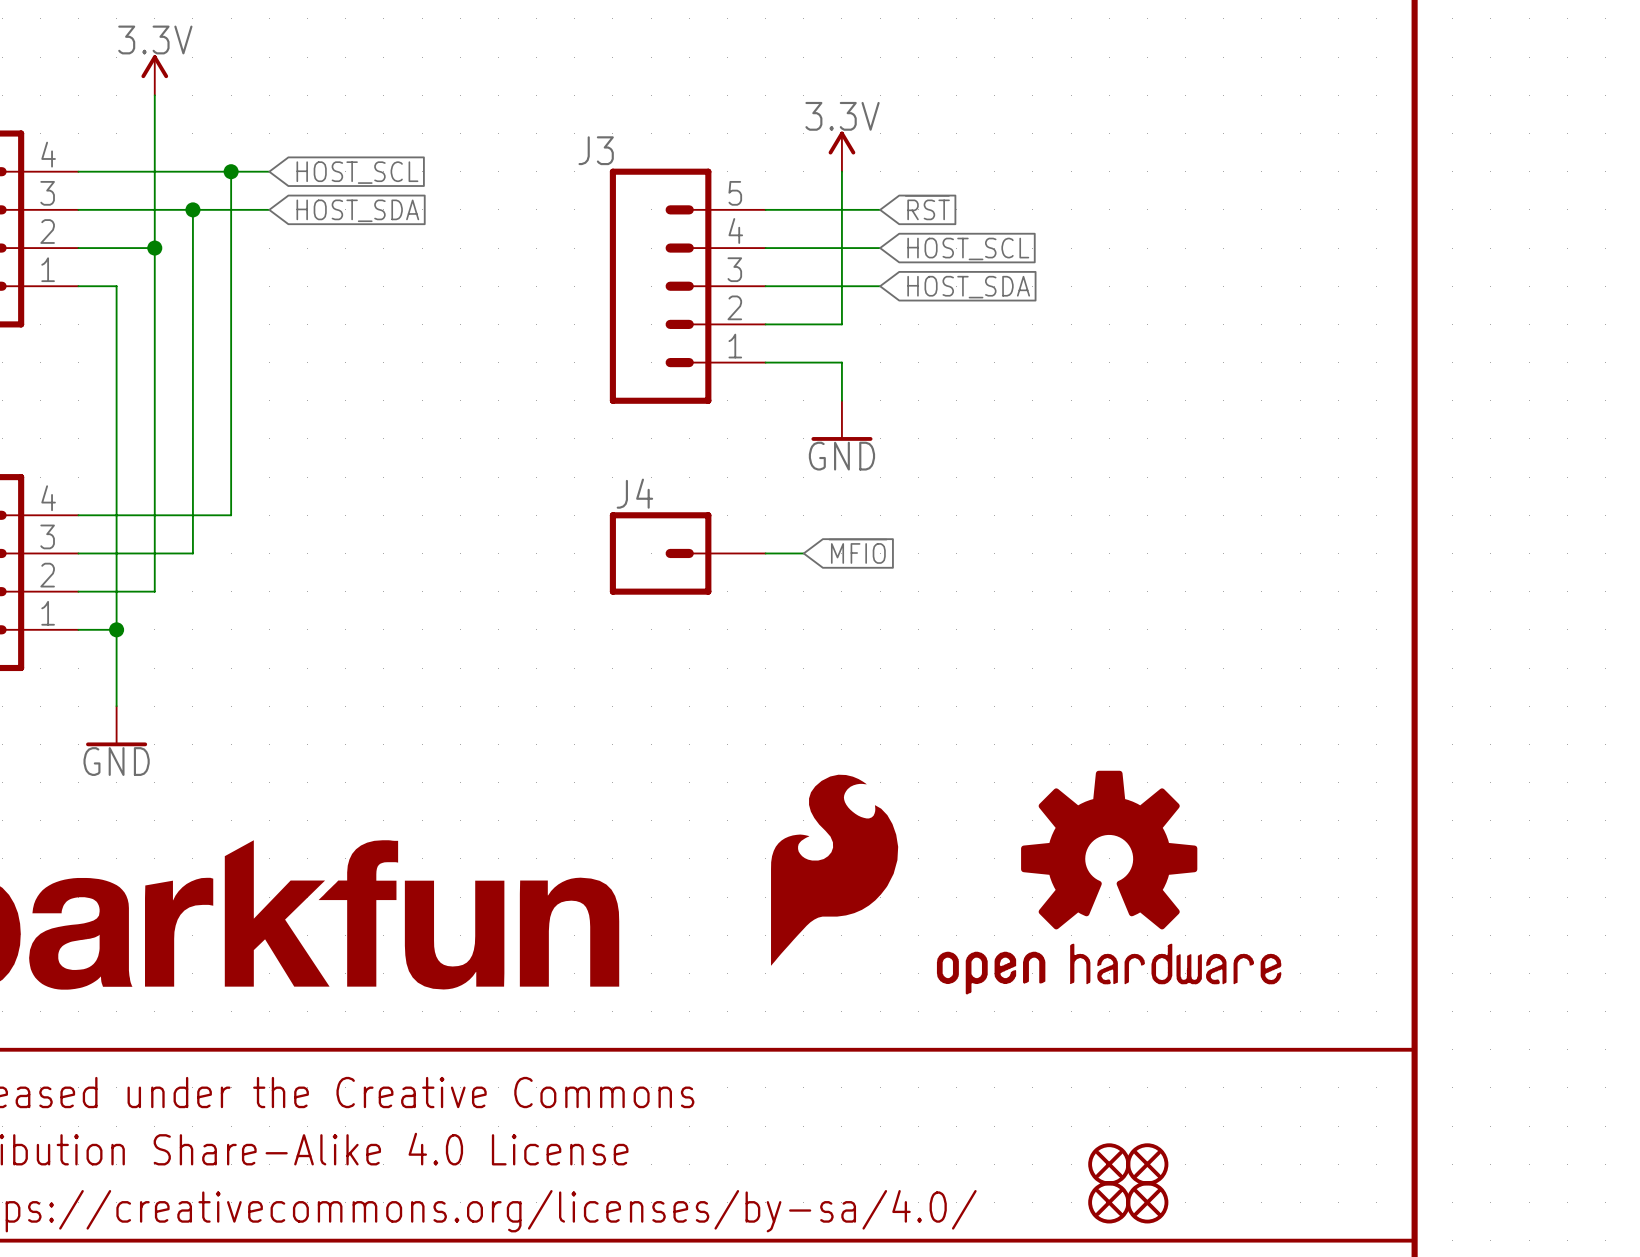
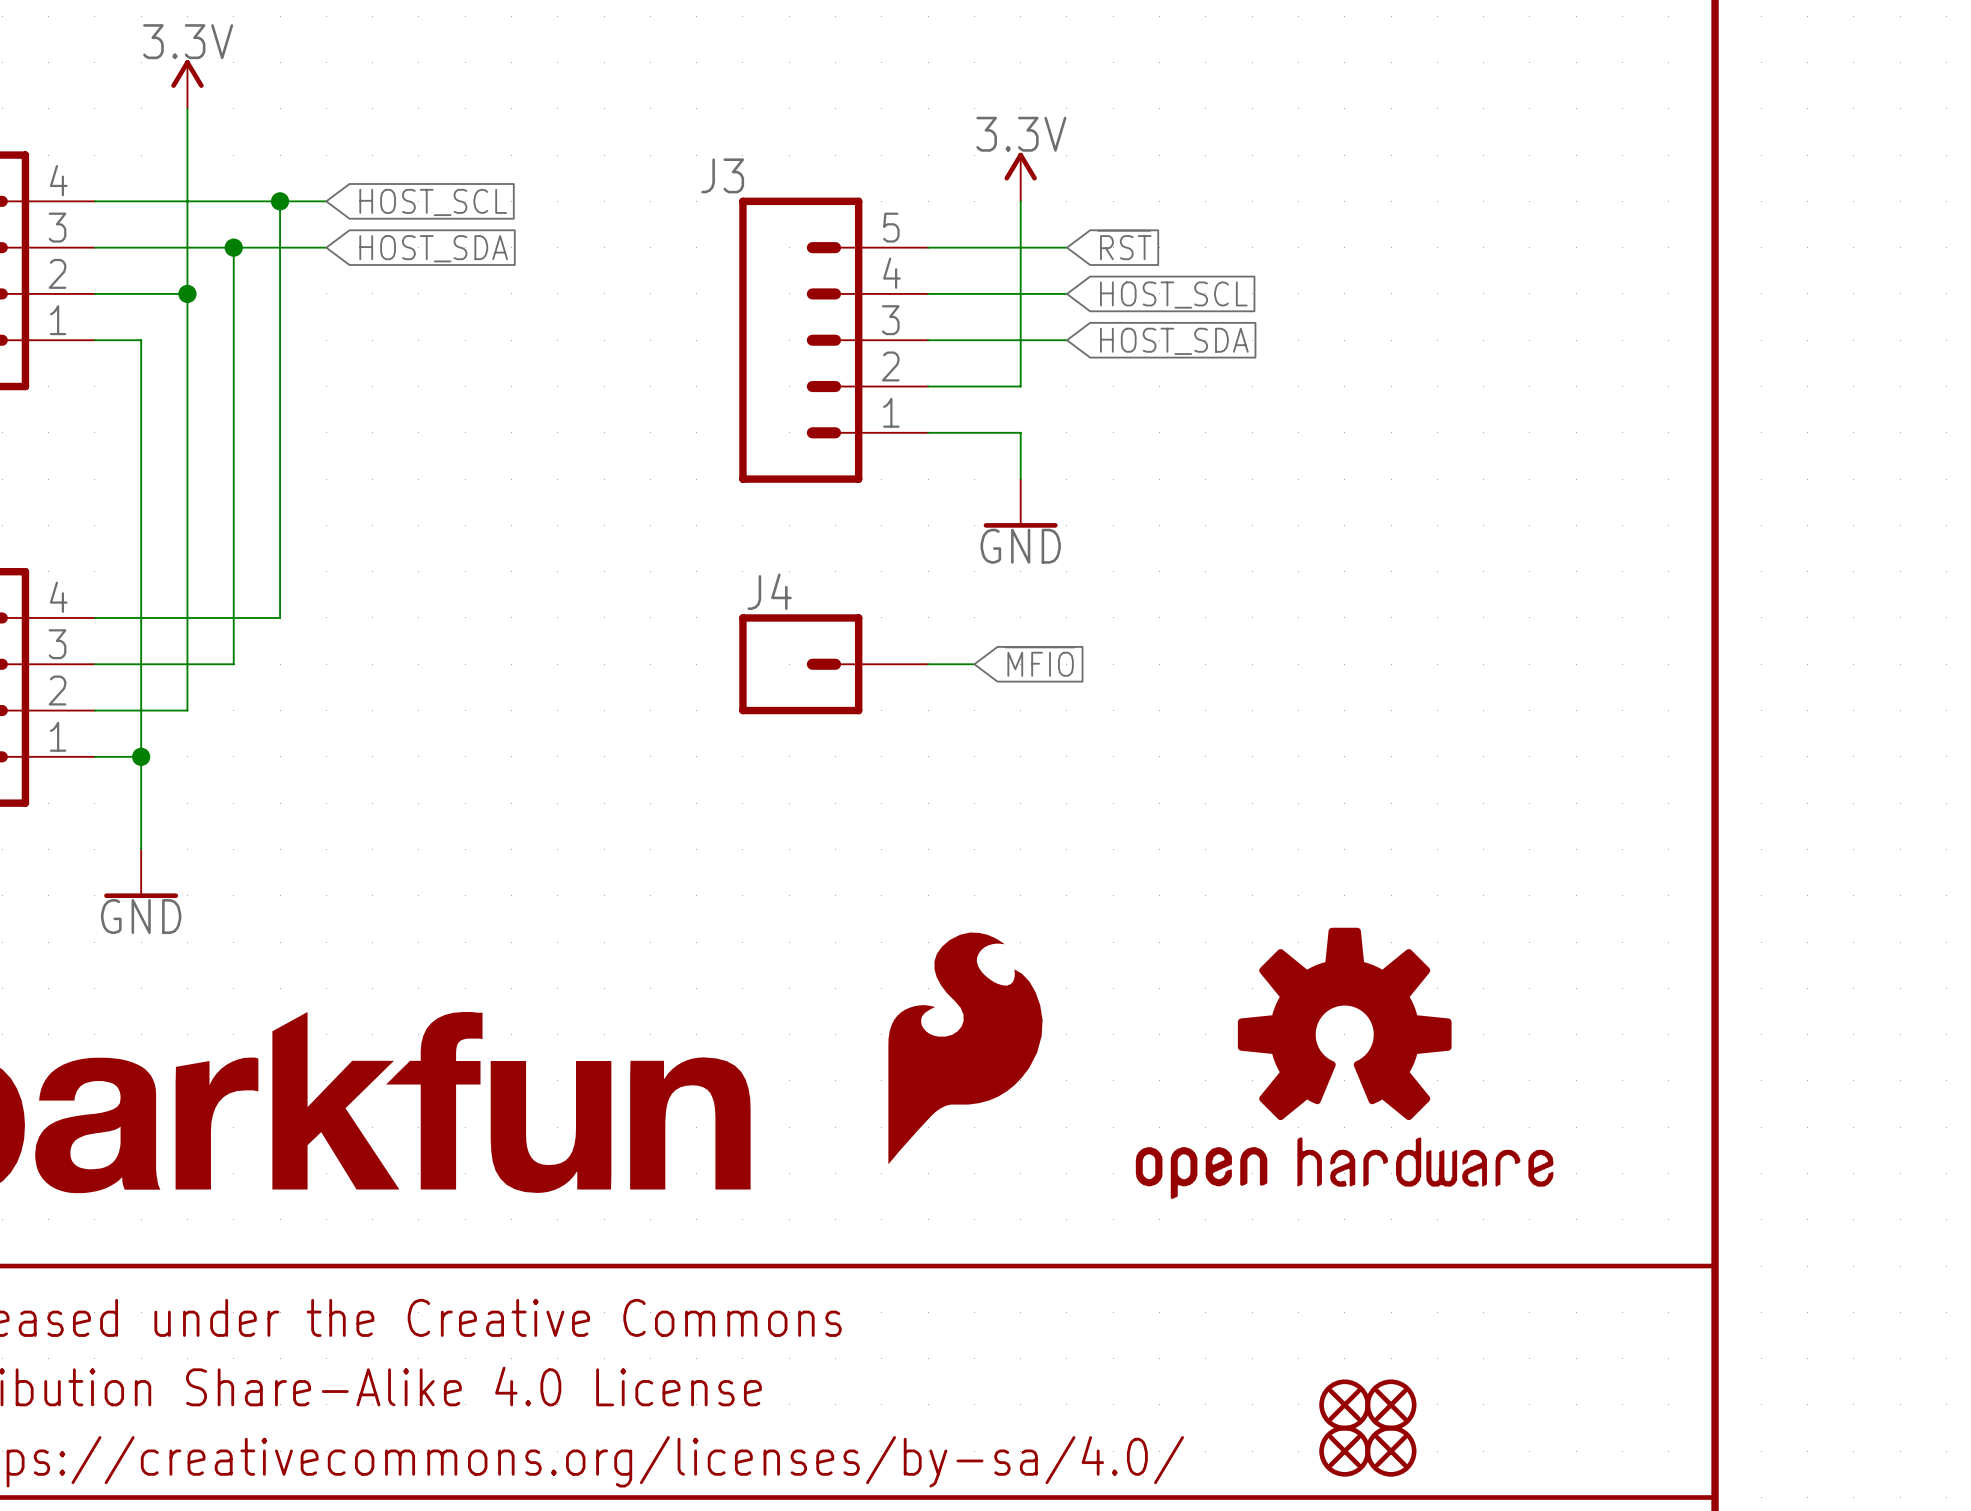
part position: (834, 870) -> (965, 1048)

